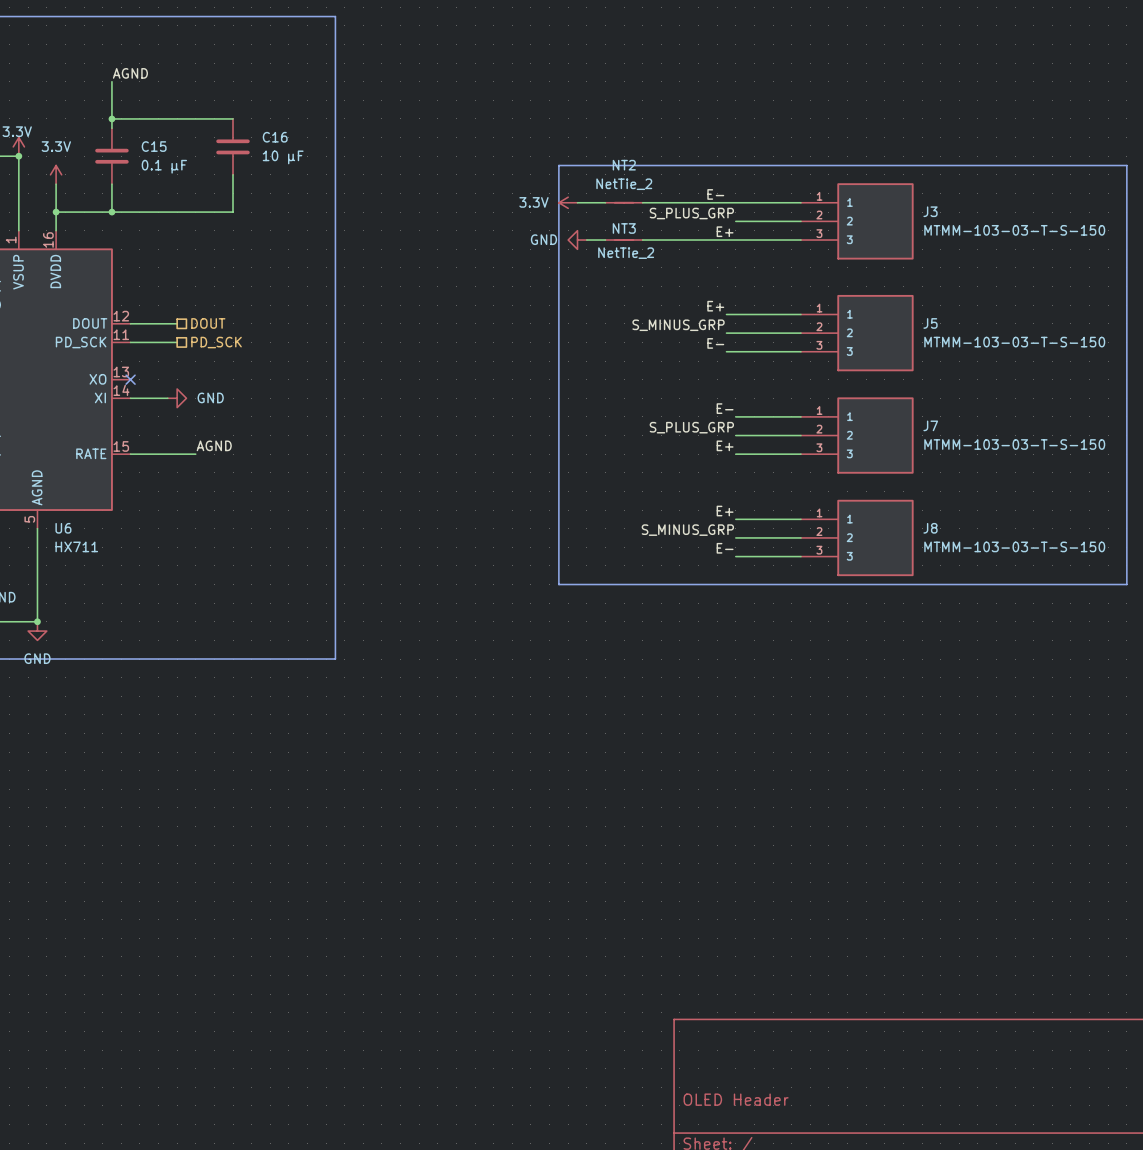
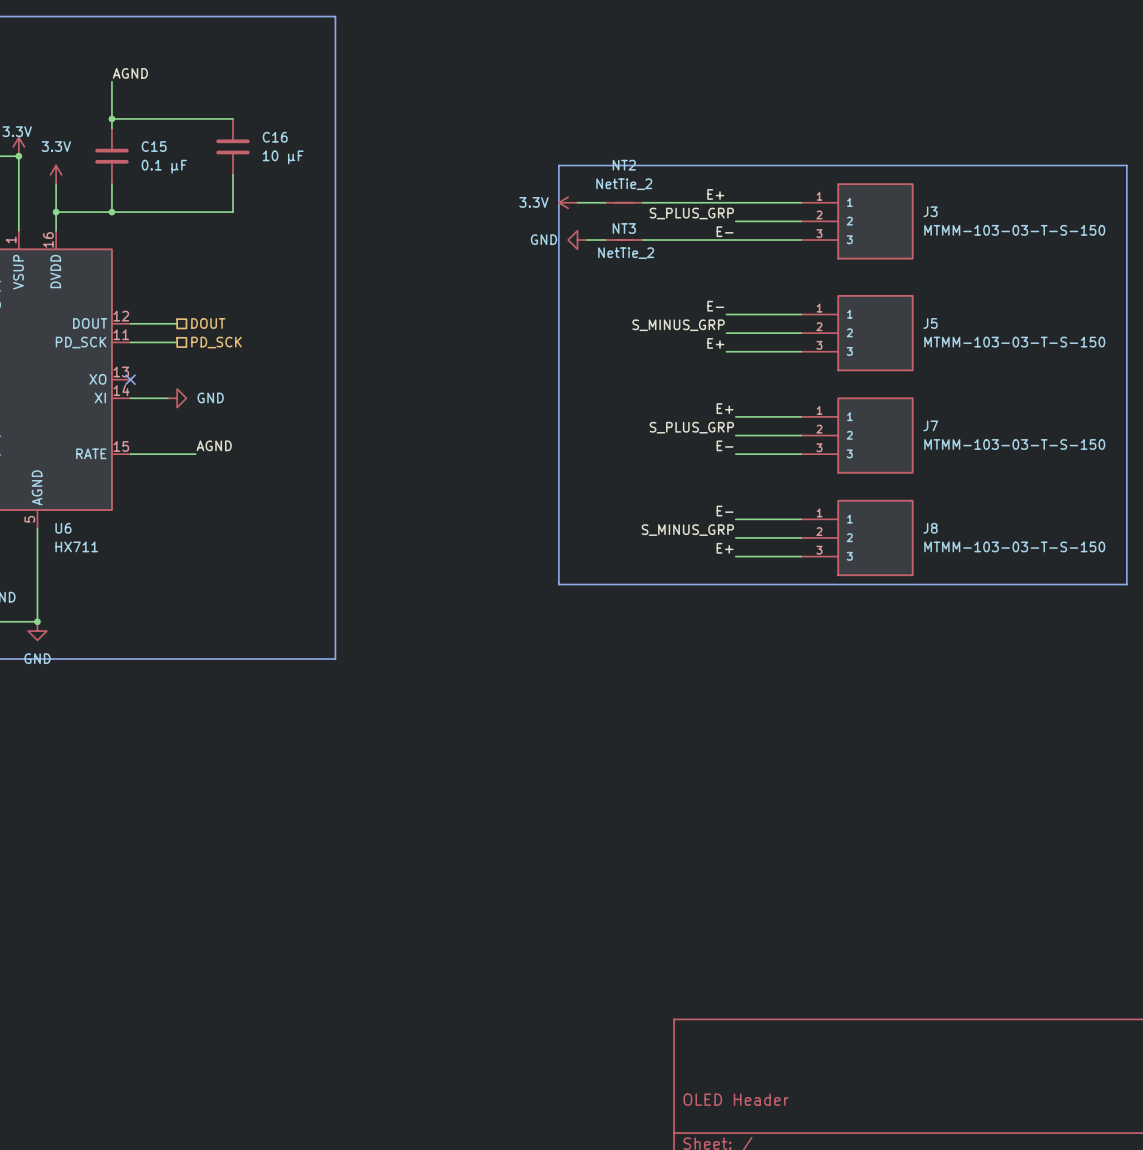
label: E- (715, 194) -> E+ (715, 194)
label: E+ (725, 231) -> E- (725, 231)
label: E+ (715, 306) -> E- (715, 306)
label: E- (715, 343) -> E+ (715, 343)
label: E- (725, 408) -> E+ (725, 408)
label: E+ (725, 445) -> E- (725, 445)
label: E+ (725, 511) -> E- (725, 511)
label: E- (725, 548) -> E+ (725, 548)

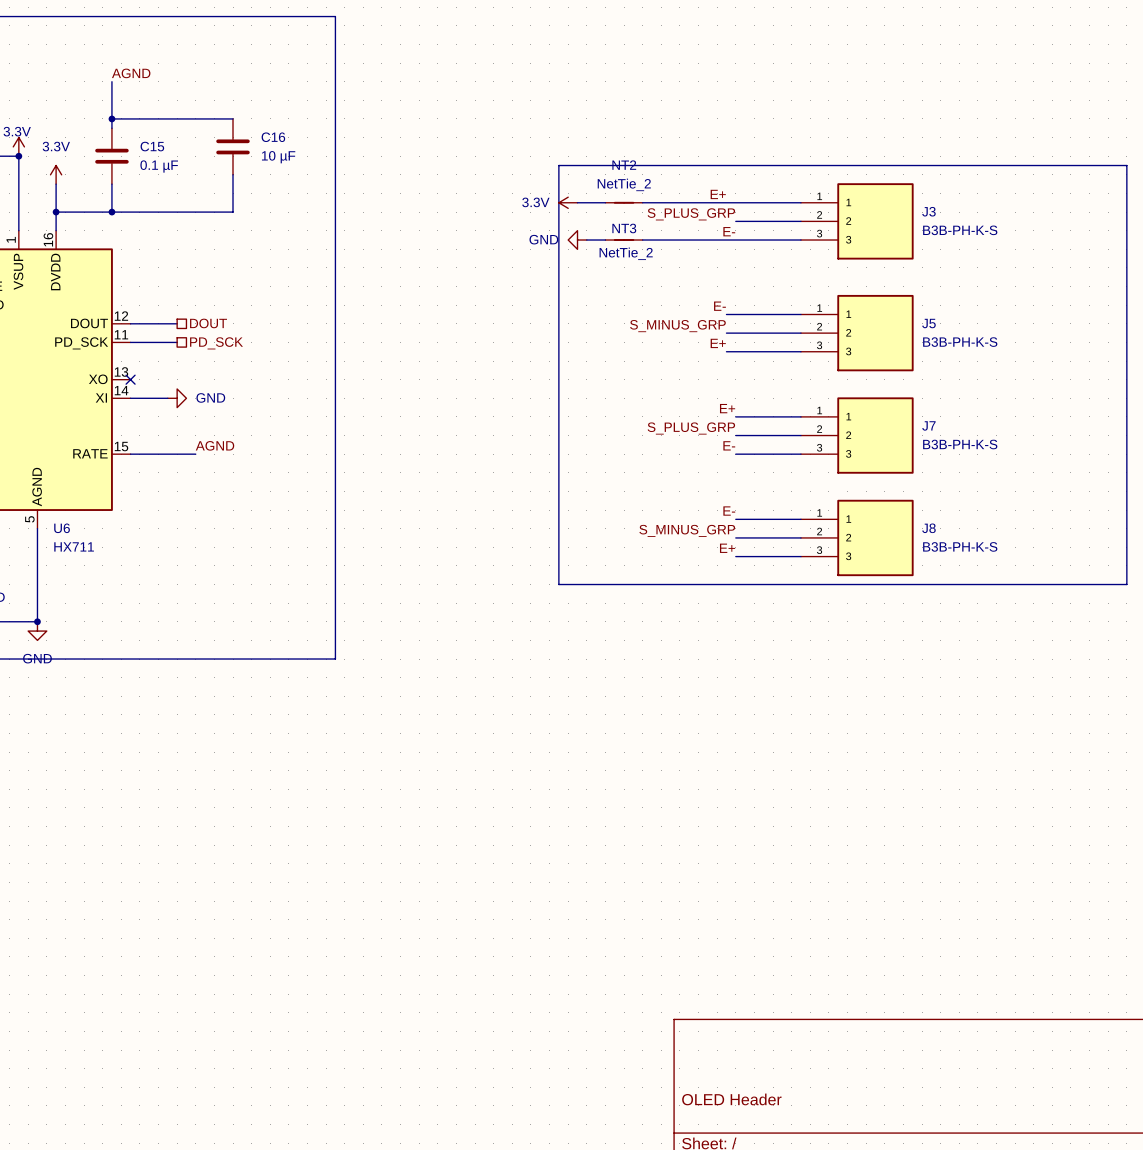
J3 value: MTMM-103-03-T-S-150 (1014, 230) -> B3B-PH-K-S (960, 230)
J5 value: MTMM-103-03-T-S-150 (1014, 342) -> B3B-PH-K-S (960, 342)
J7 value: MTMM-103-03-T-S-150 (1014, 444) -> B3B-PH-K-S (960, 444)
J8 value: MTMM-103-03-T-S-150 (1014, 546) -> B3B-PH-K-S (960, 546)

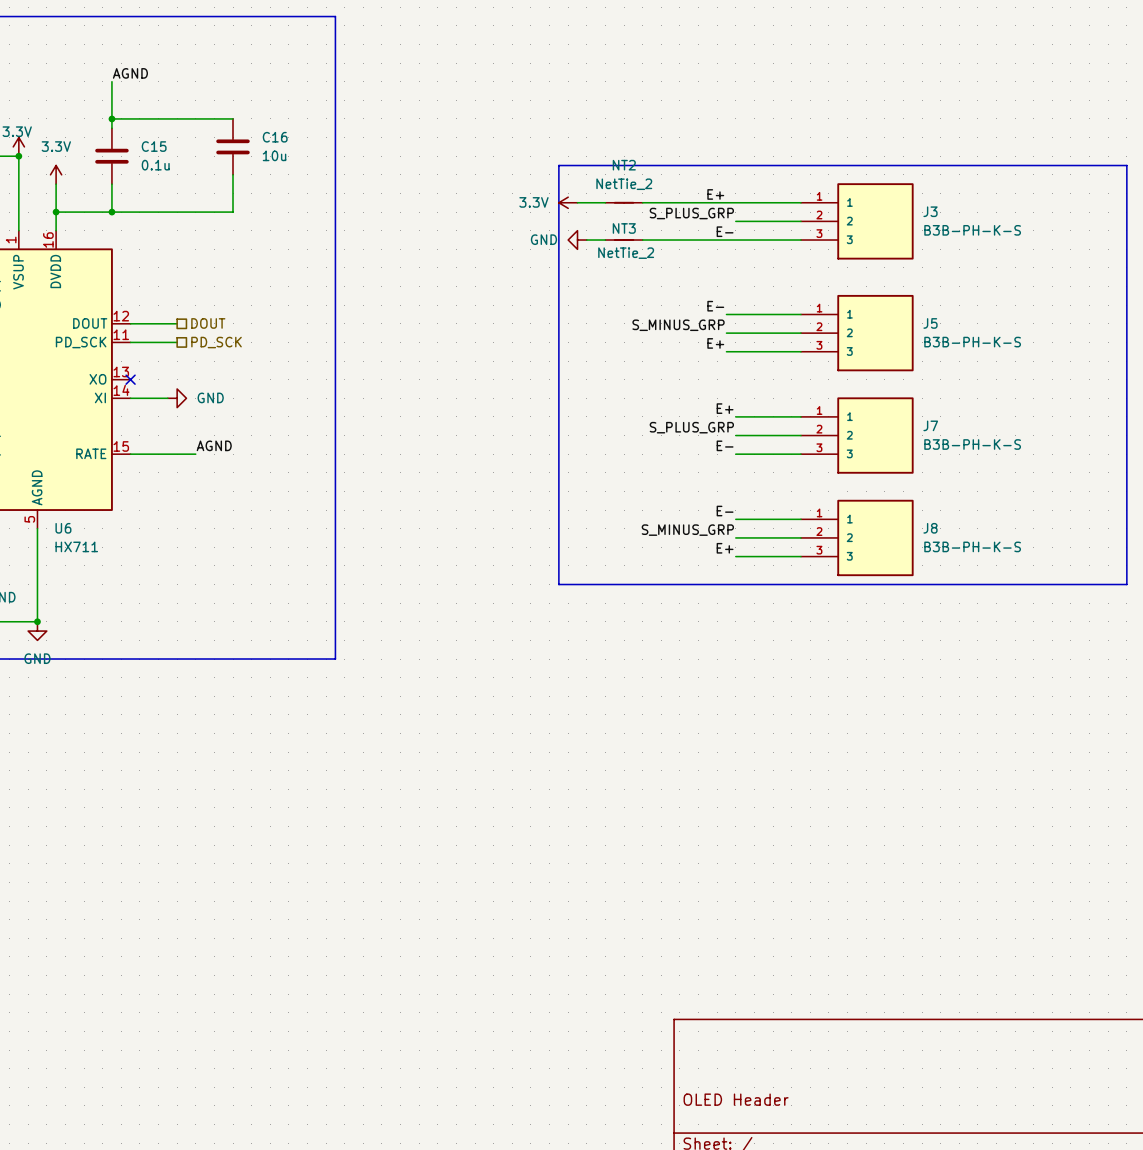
C16 value: 10 µF (278, 157) -> 10u (274, 155)
C15 value: 0.1 µF (159, 166) -> 0.1u (155, 165)

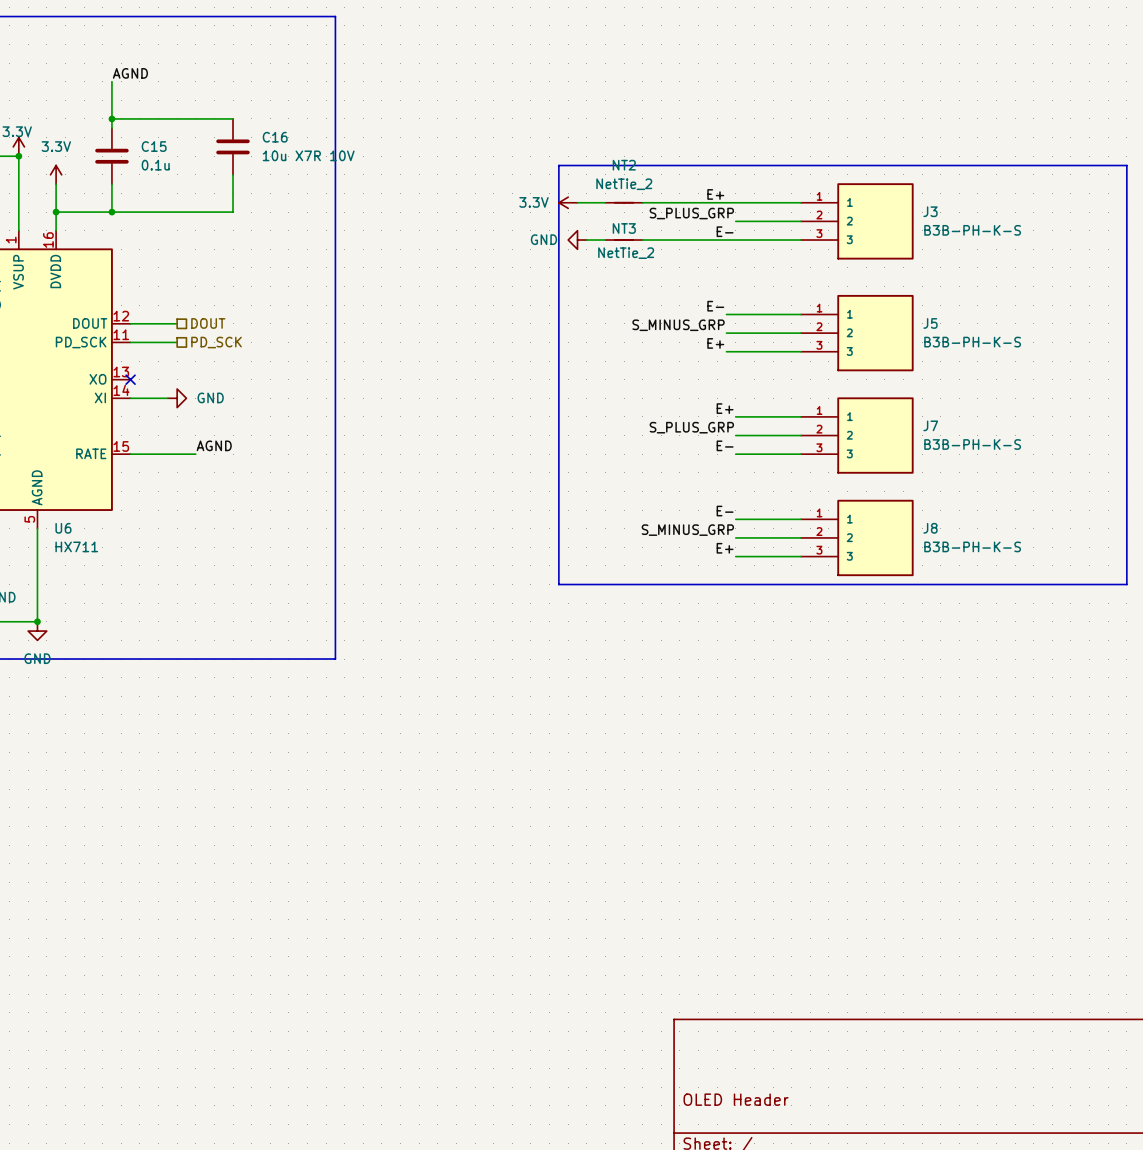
C16 value: 10u (274, 155) -> 10u X7R 10V (308, 155)

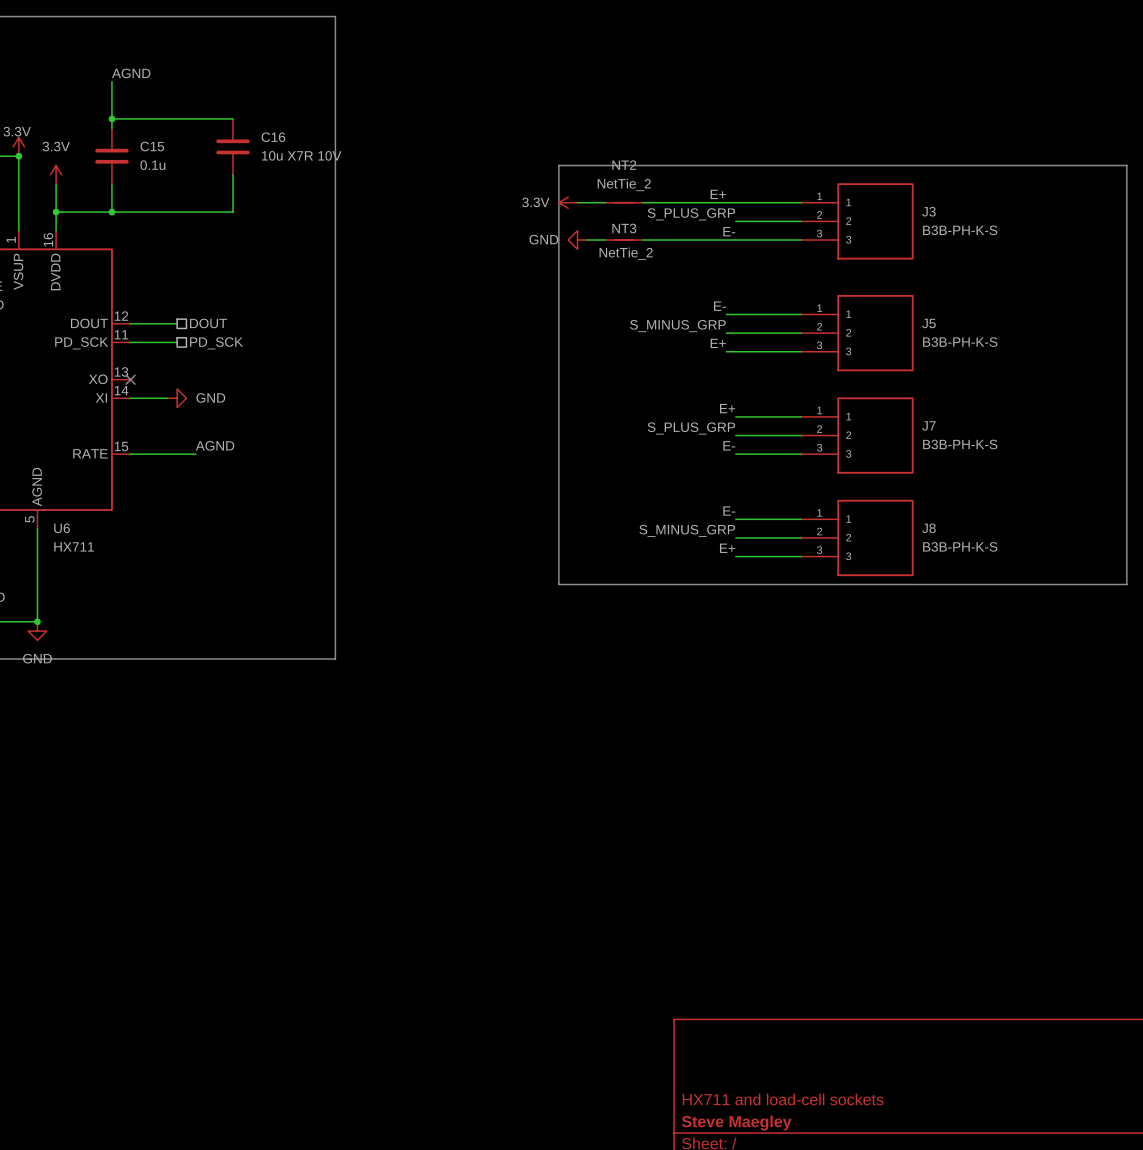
title block: OLED Header (736, 1099) -> HX711 and load-cell sockets (783, 1099)
title block: none -> Steve Maegley (736, 1123)

